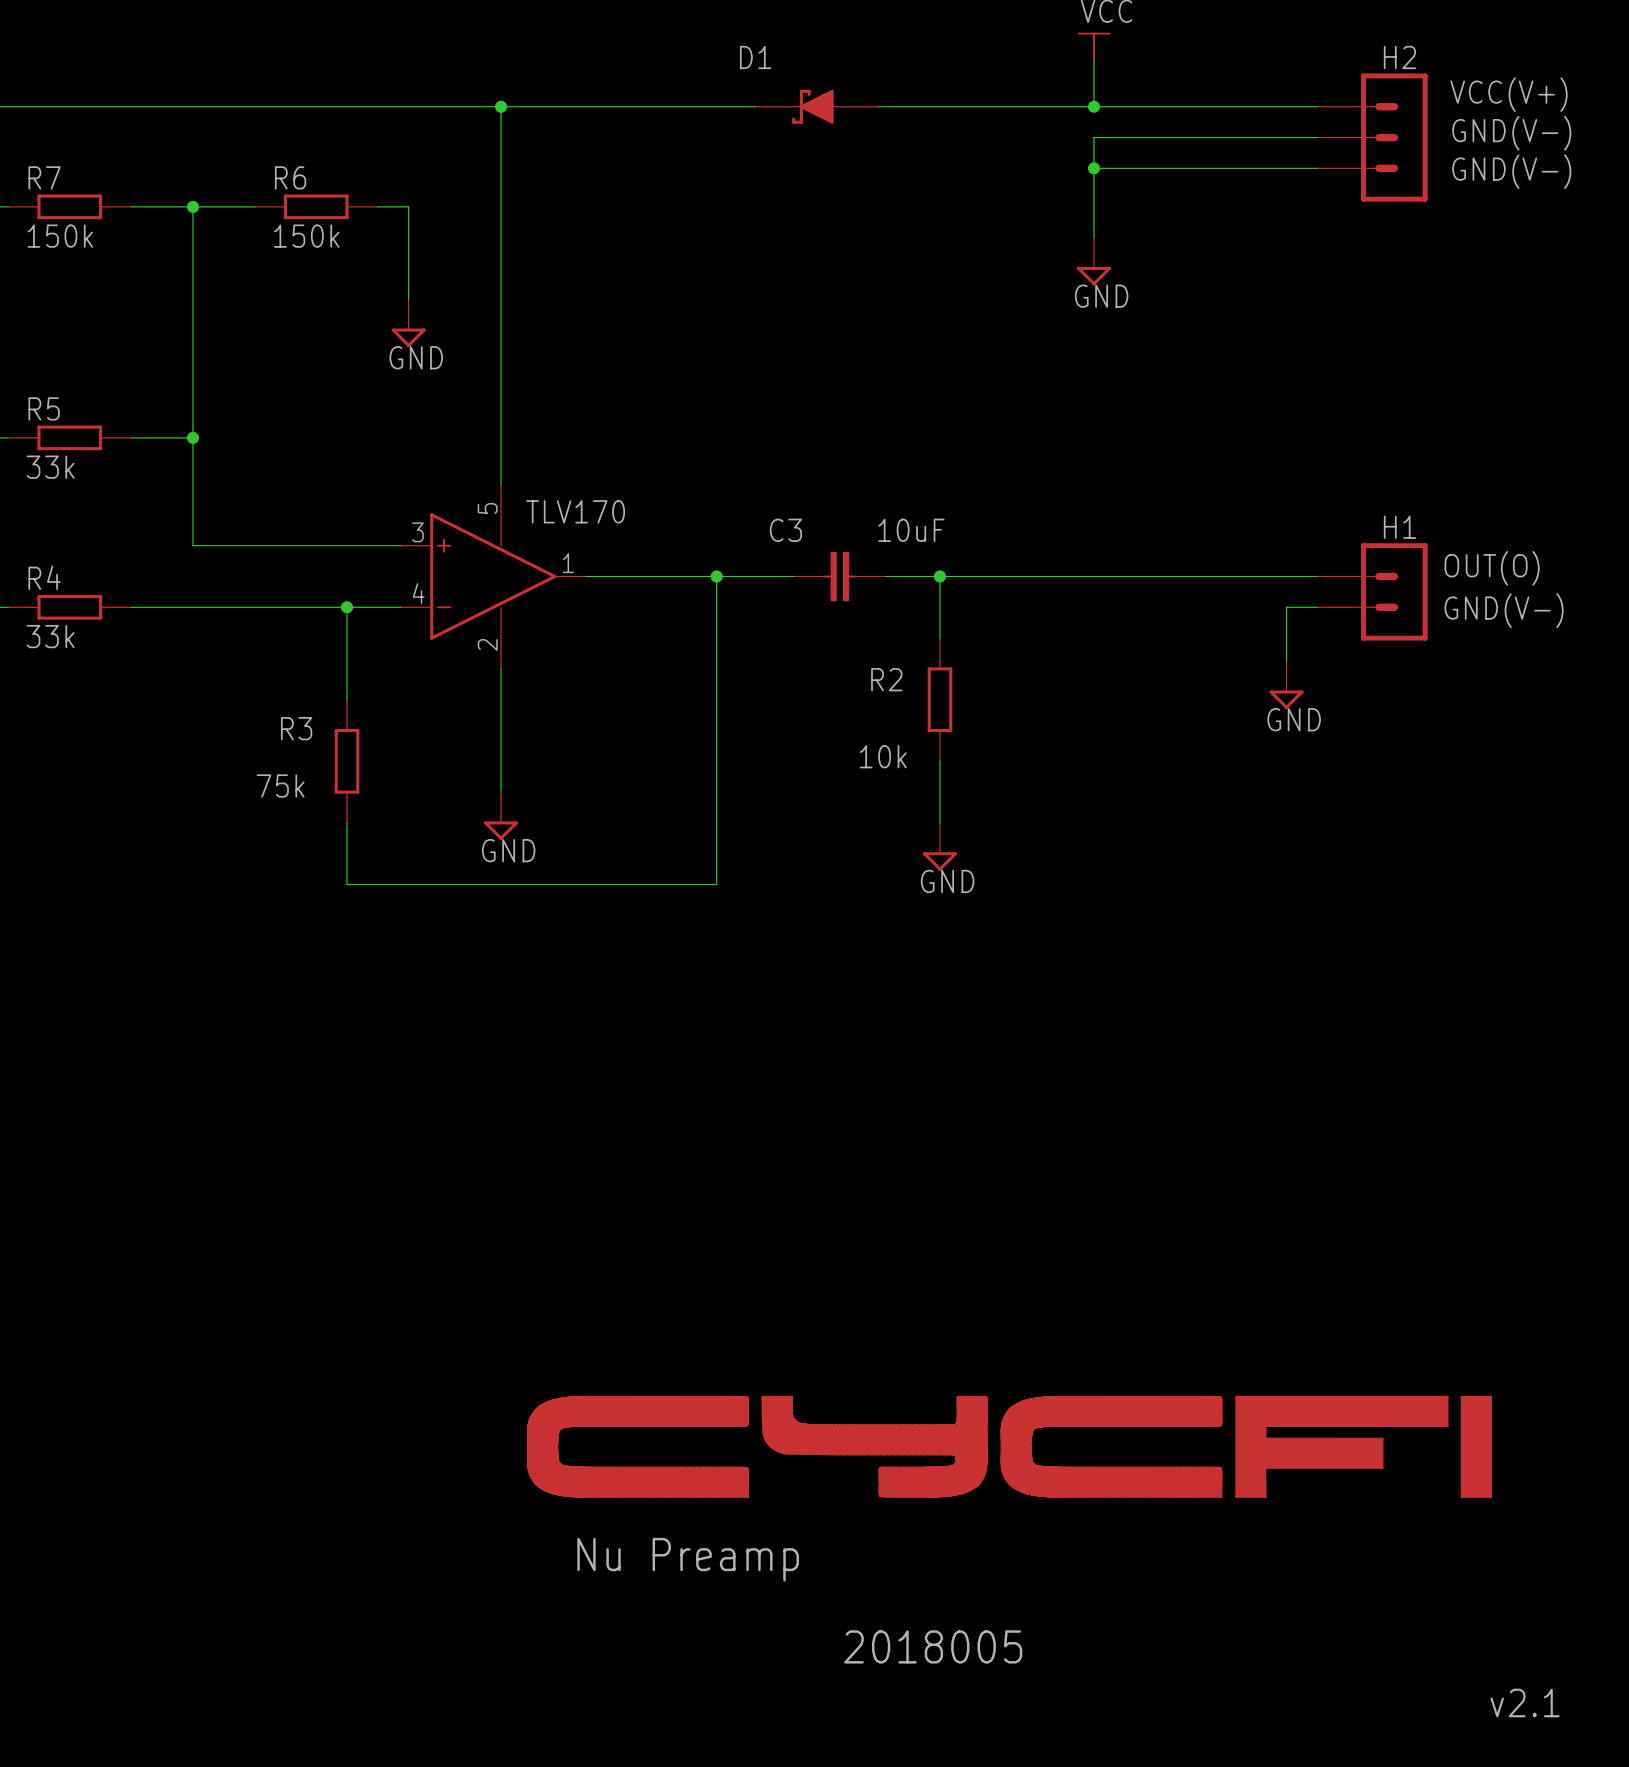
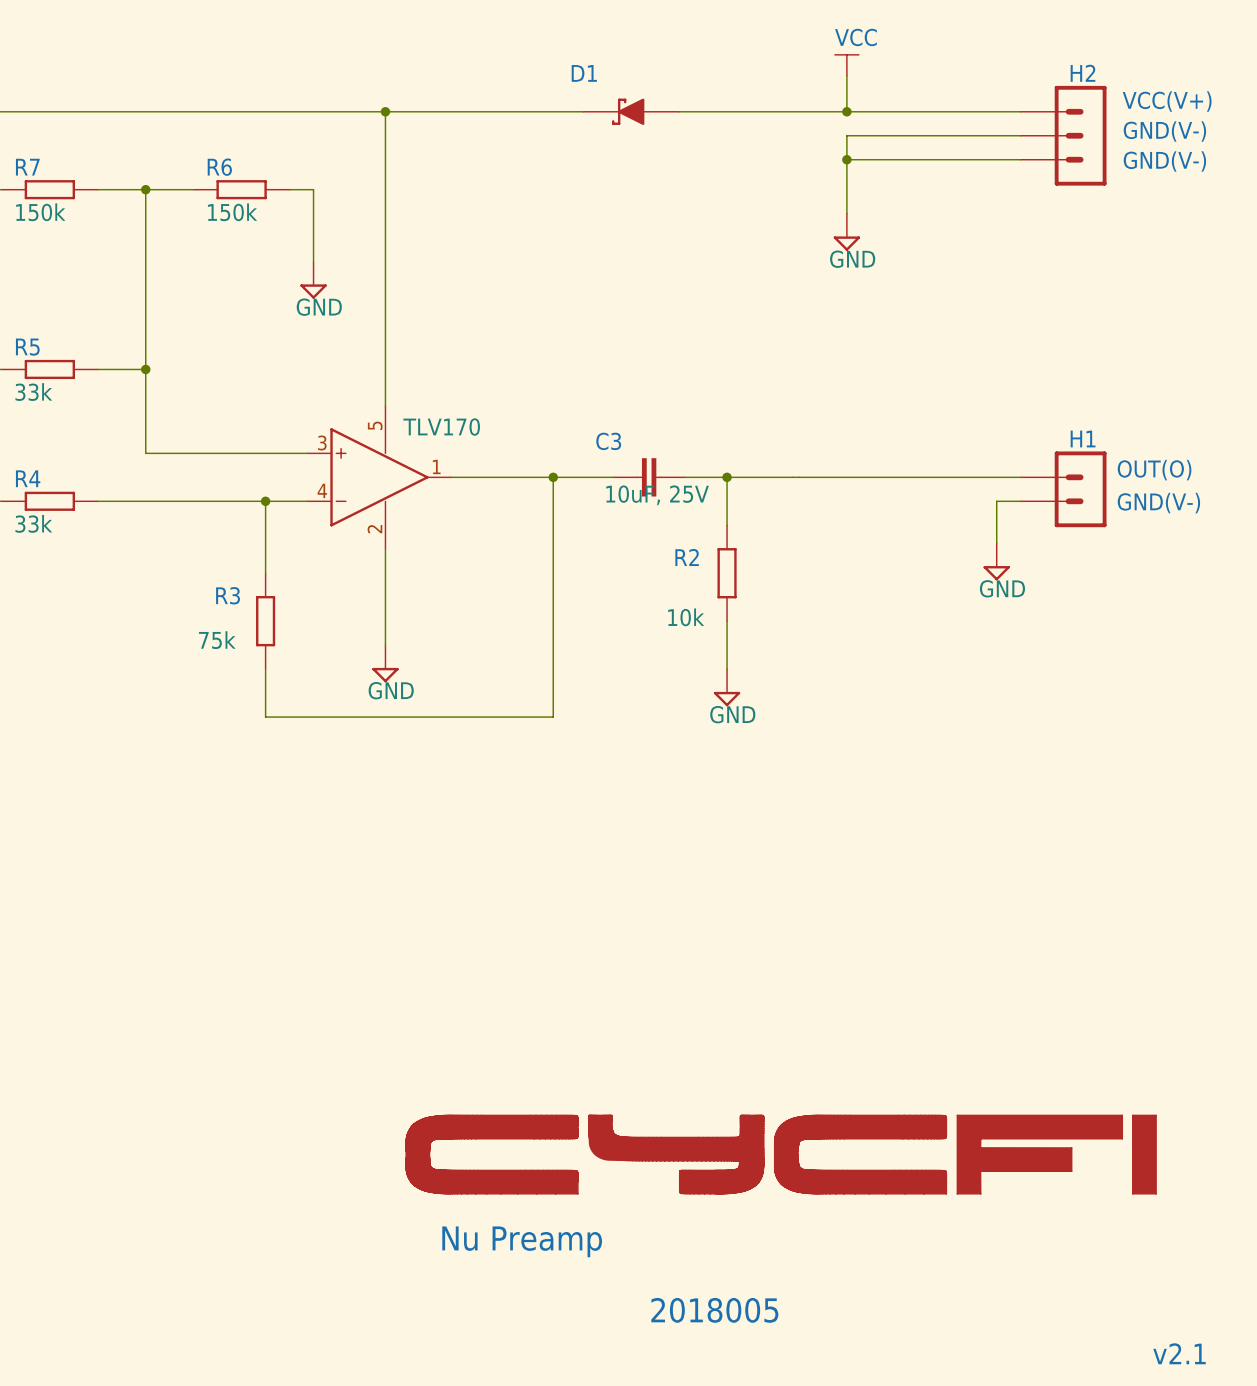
C3 value: 10uF (911, 530) -> 10uF, 25V (657, 495)

